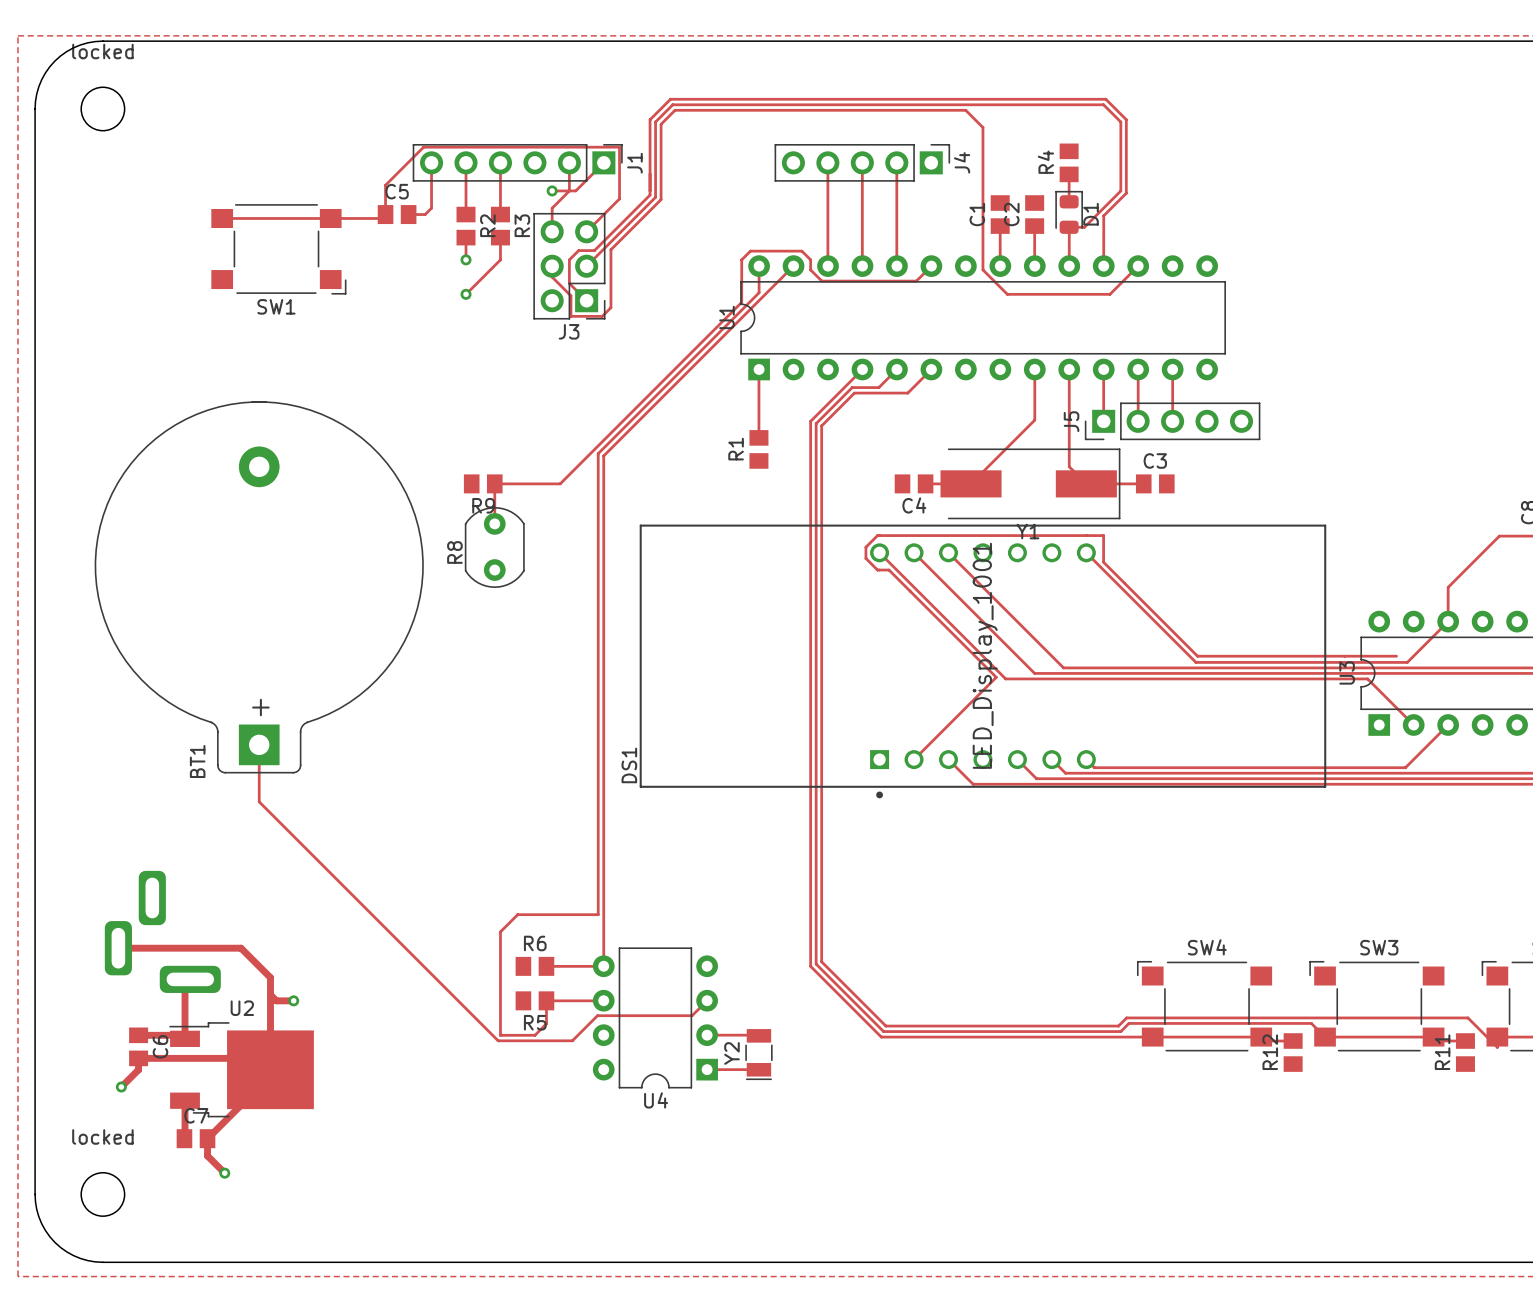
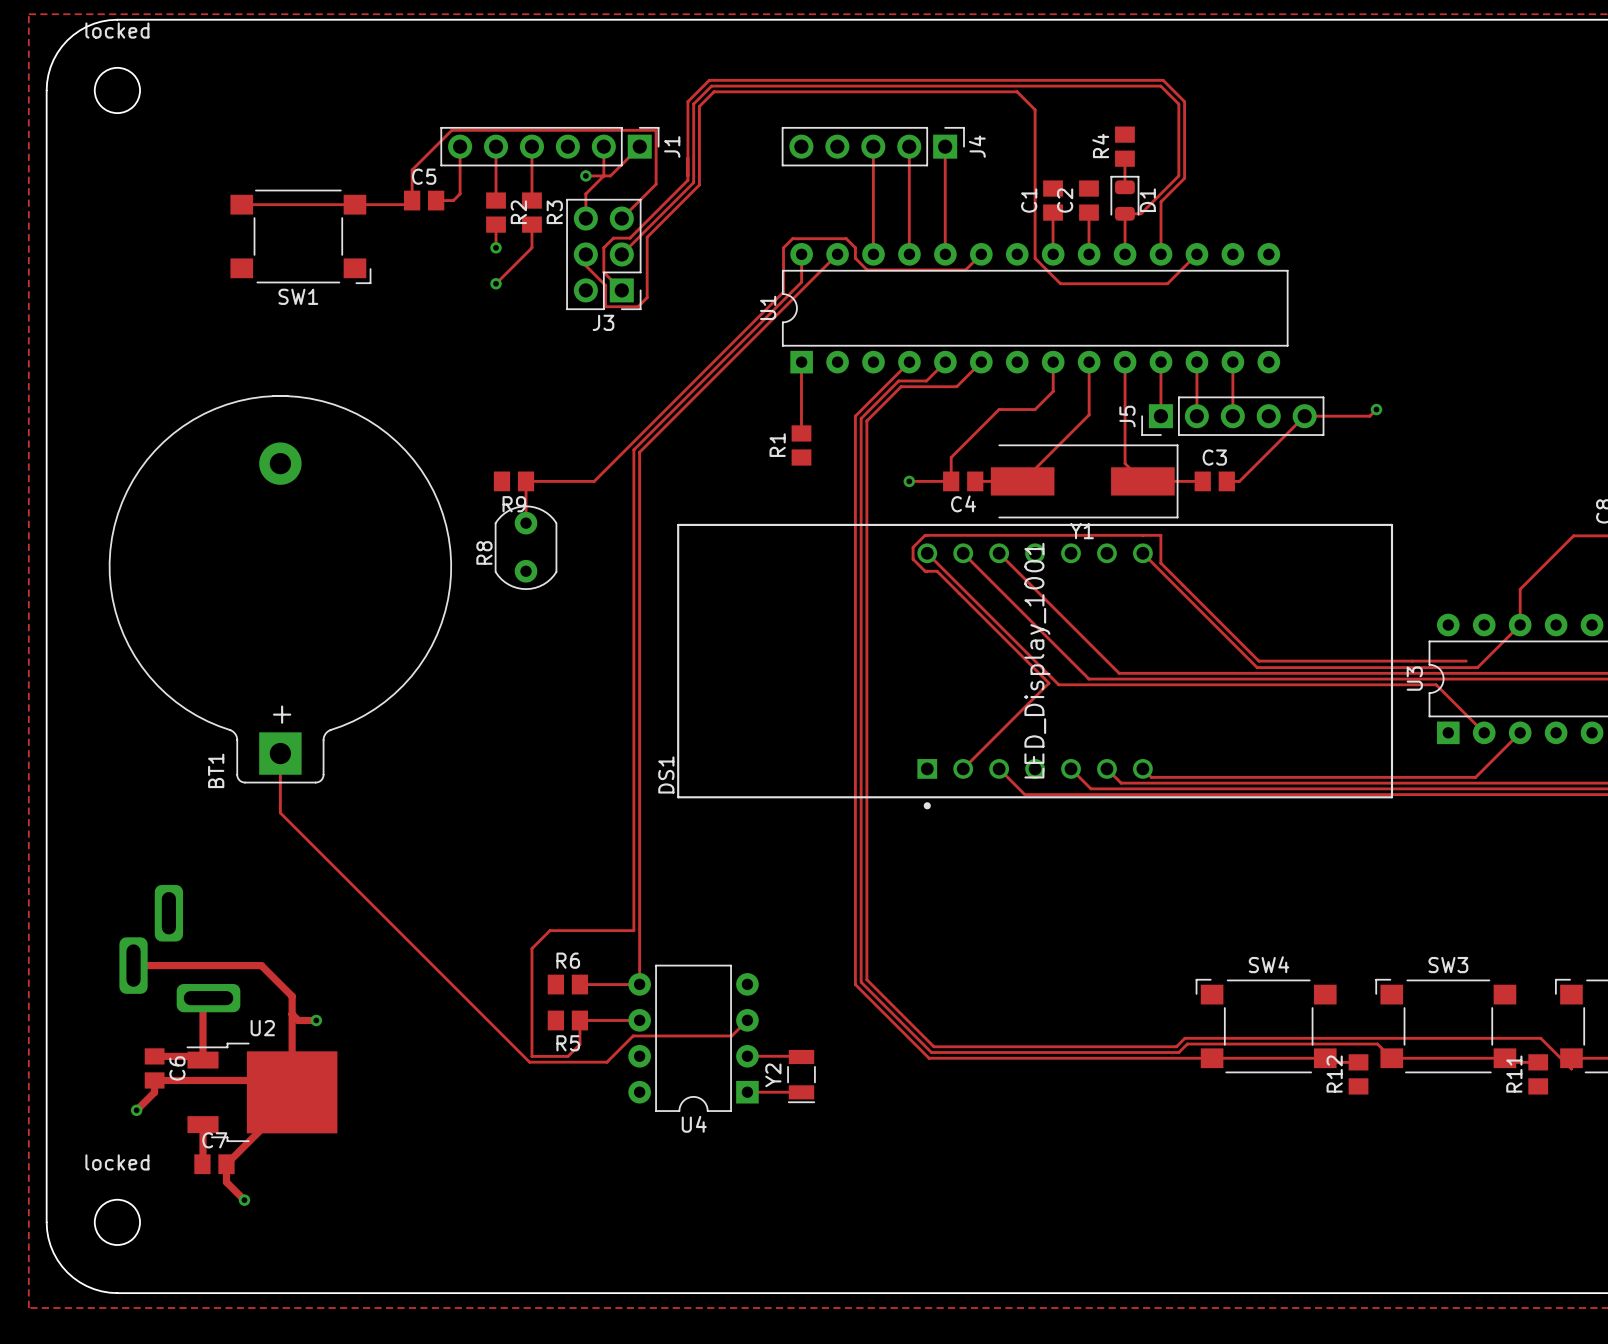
J4 position: (862, 162) -> (873, 146)
track: none -> (1053, 362) (1053, 391) (1035, 409) (999, 409) (951, 457) (951, 481) (909, 481)
track: none -> (1376, 409) (1369, 416) (1304, 416) (1239, 481) (1226, 481)
via: none -> (1376, 409)
via: none -> (909, 481)

